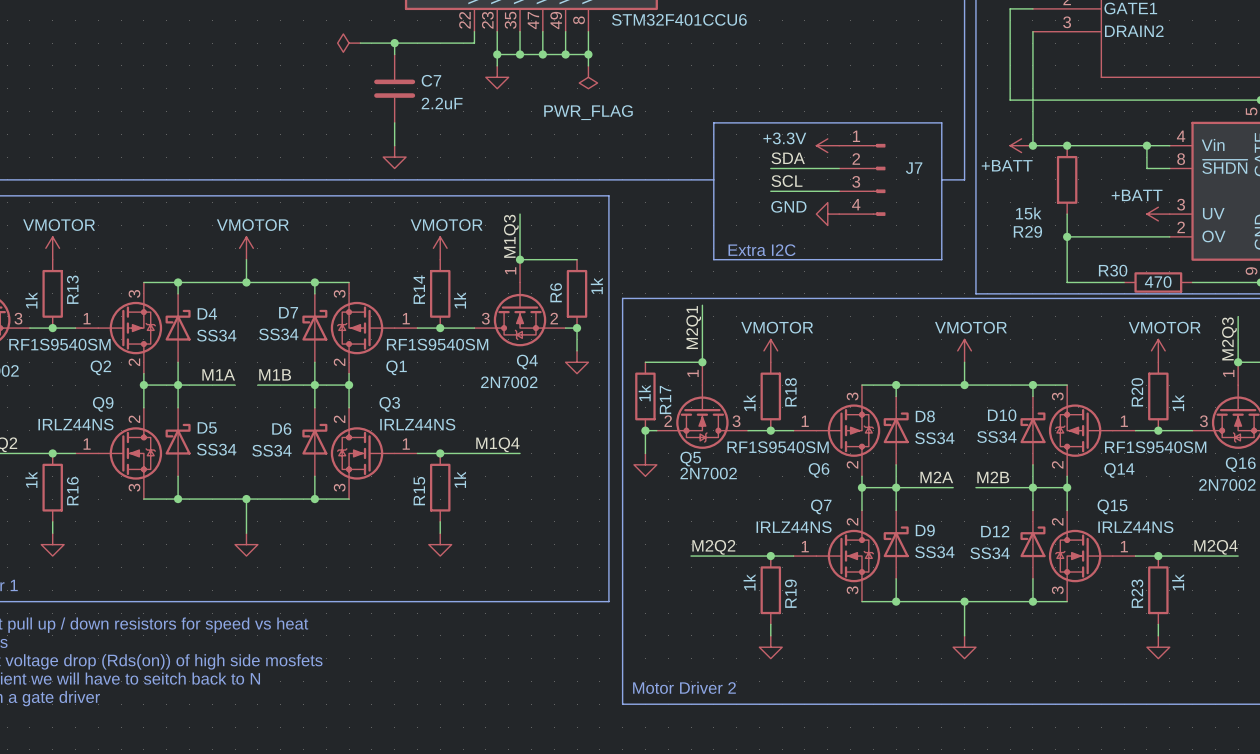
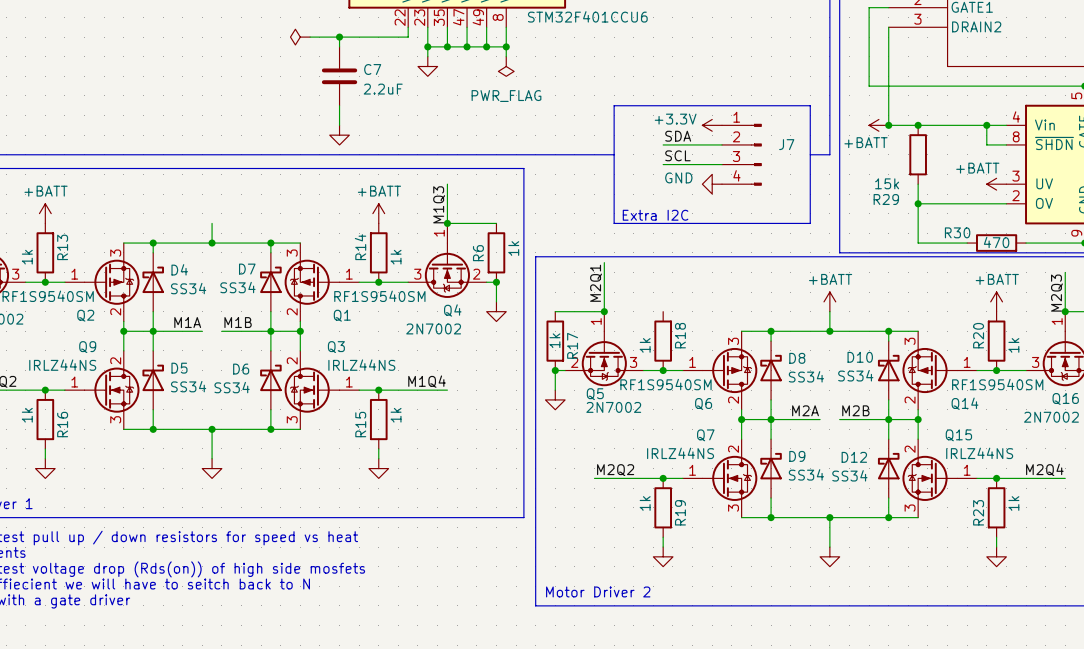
power symbol: VMOTOR (52, 248) -> +BATT (45, 213)
power symbol: VMOTOR (246, 248) -> none
power symbol: VMOTOR (440, 248) -> +BATT (378, 213)
power symbol: VMOTOR (770, 350) -> none
power symbol: VMOTOR (964, 350) -> +BATT (829, 301)
power symbol: VMOTOR (1158, 350) -> +BATT (996, 301)

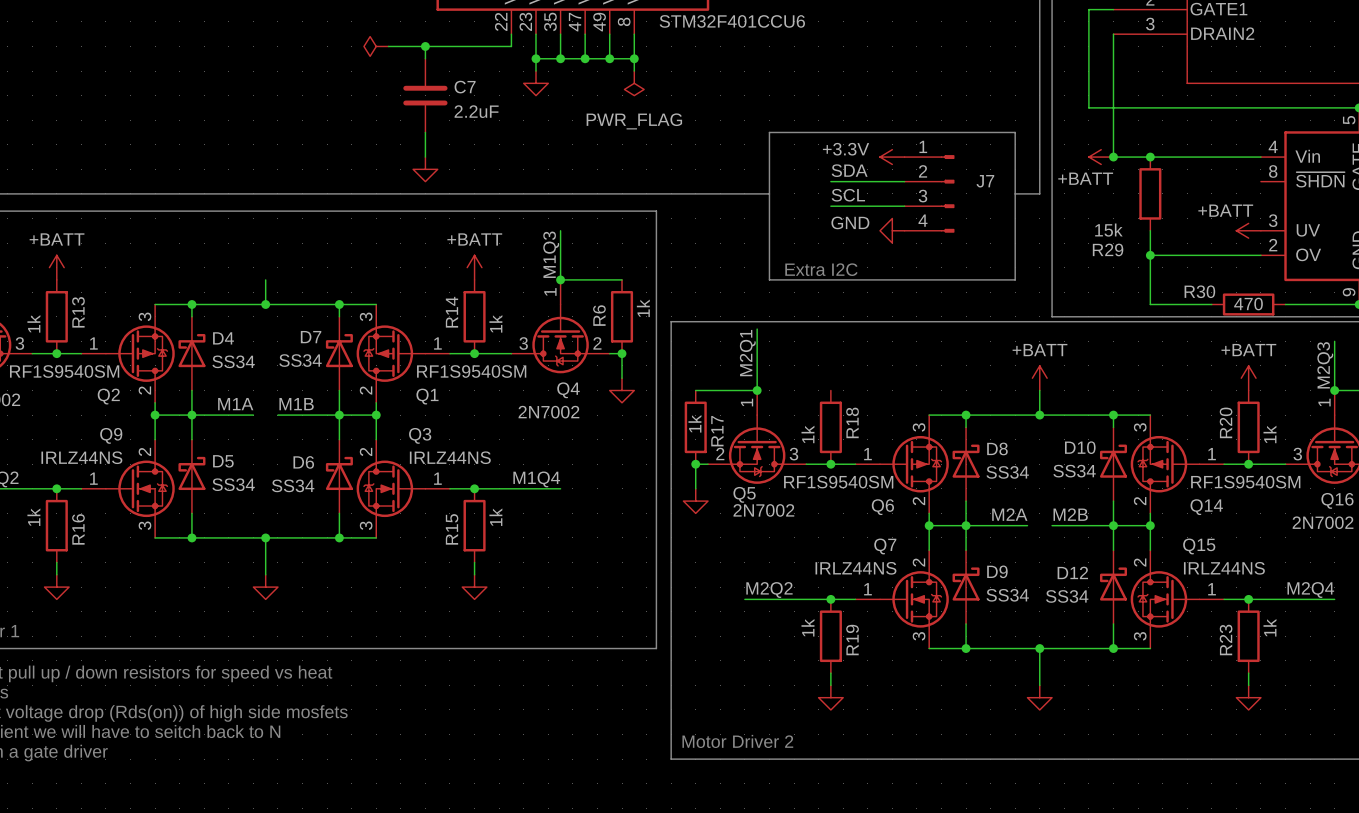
wire: (986, 125) (986, 144) (1006, 144) -> none
junction: (986, 125) -> none

